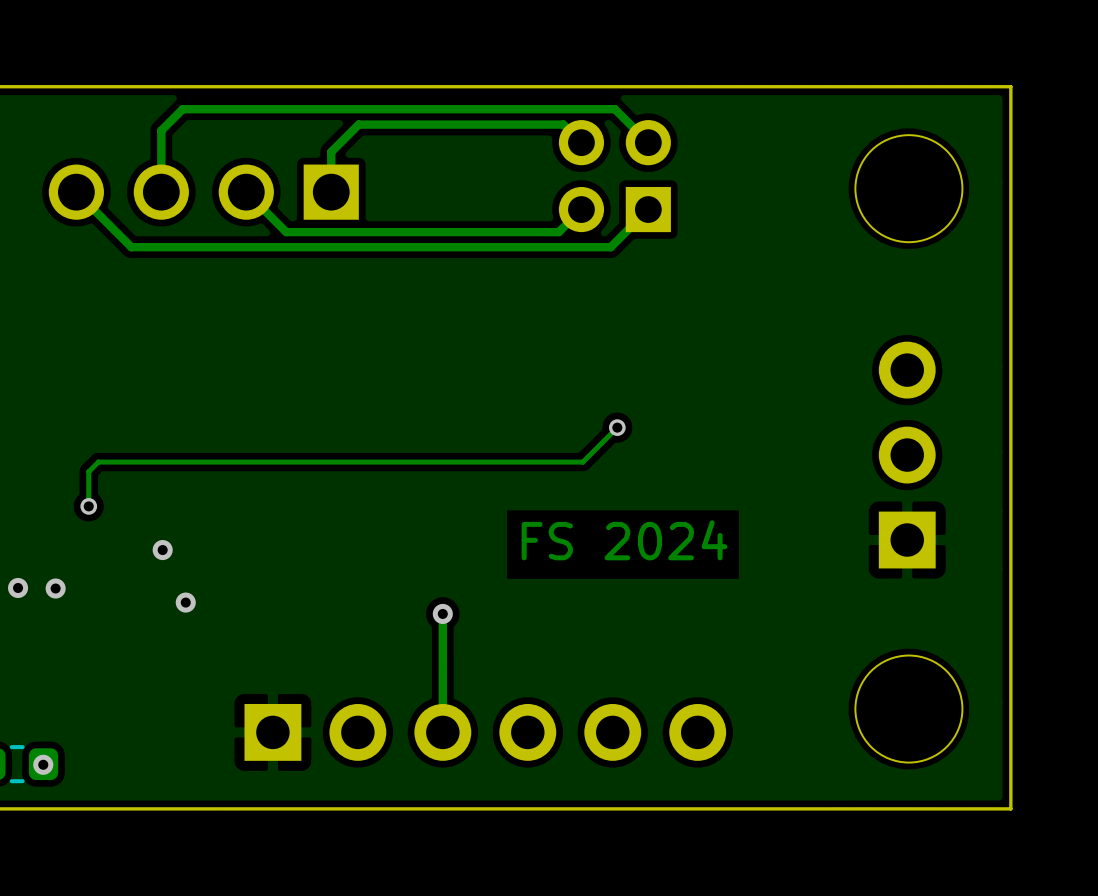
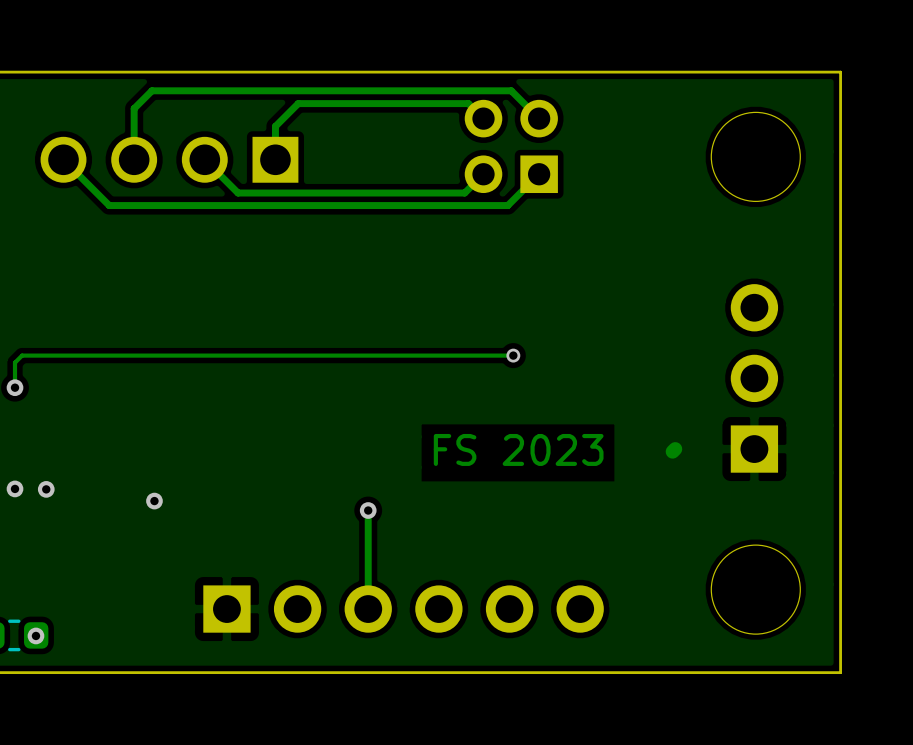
track: (617, 427) (582, 462) (98, 462) (88, 471) (88, 506) -> (513, 355) (22, 355) (15, 362) (15, 387)
via: (88, 506) -> none
text: FS 2024 (624, 540) -> FS 2023 (518, 449)
track: none -> (675, 449) (672, 451)
via position: (162, 550) -> (15, 387)

